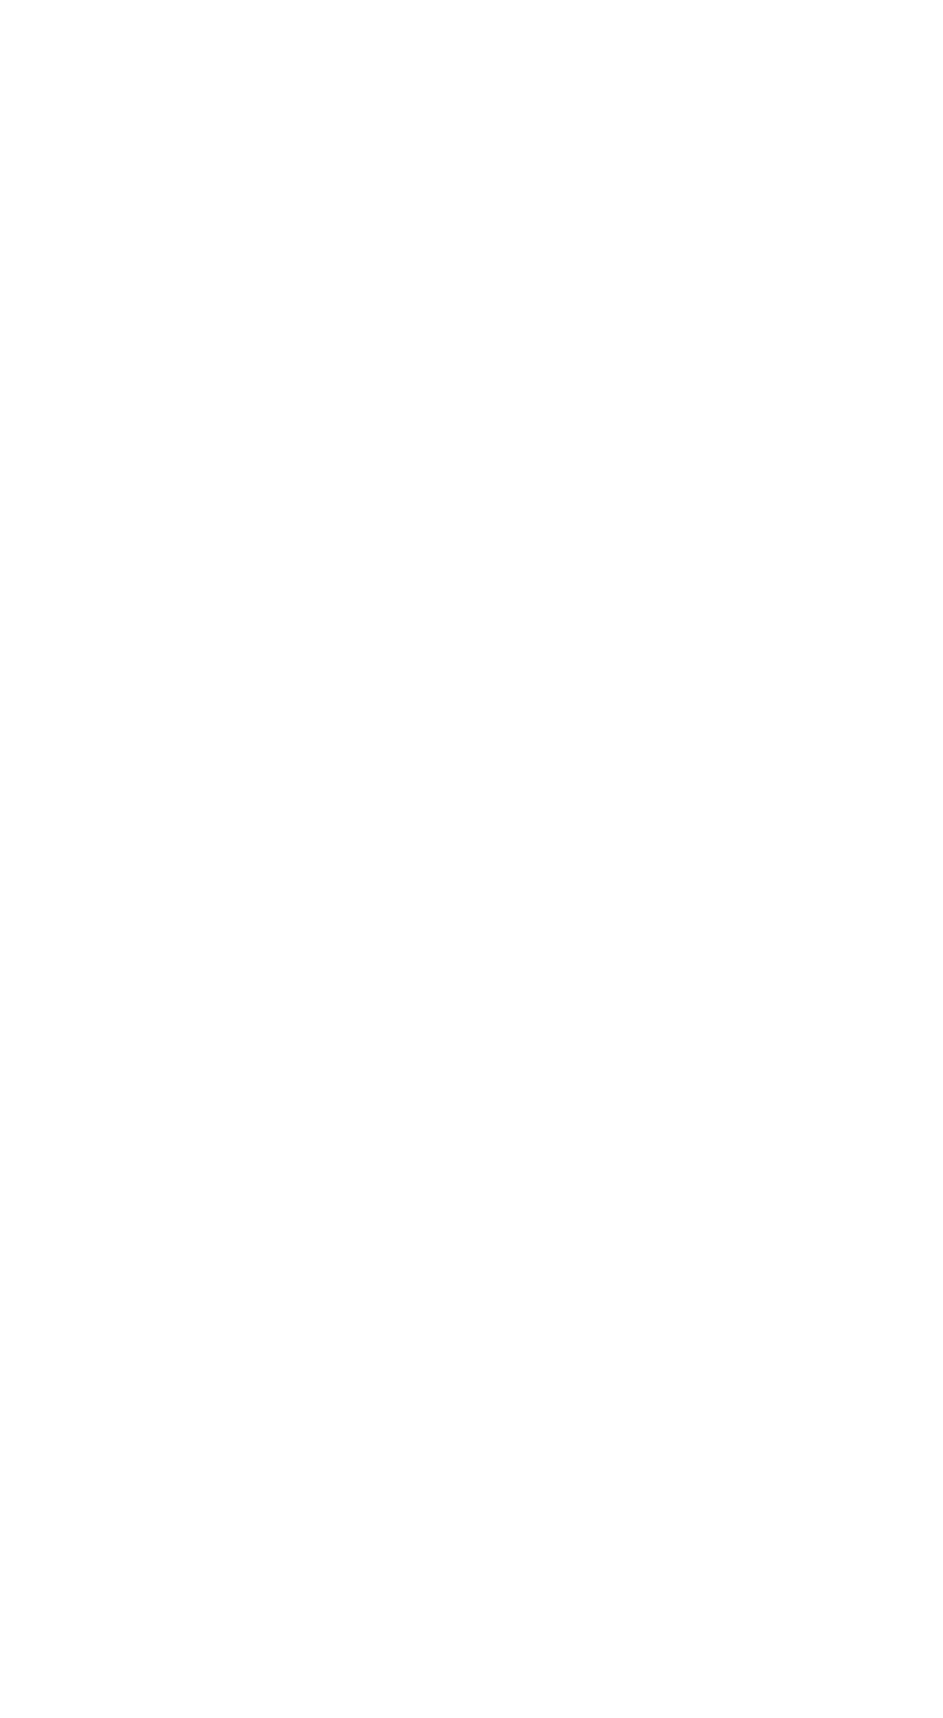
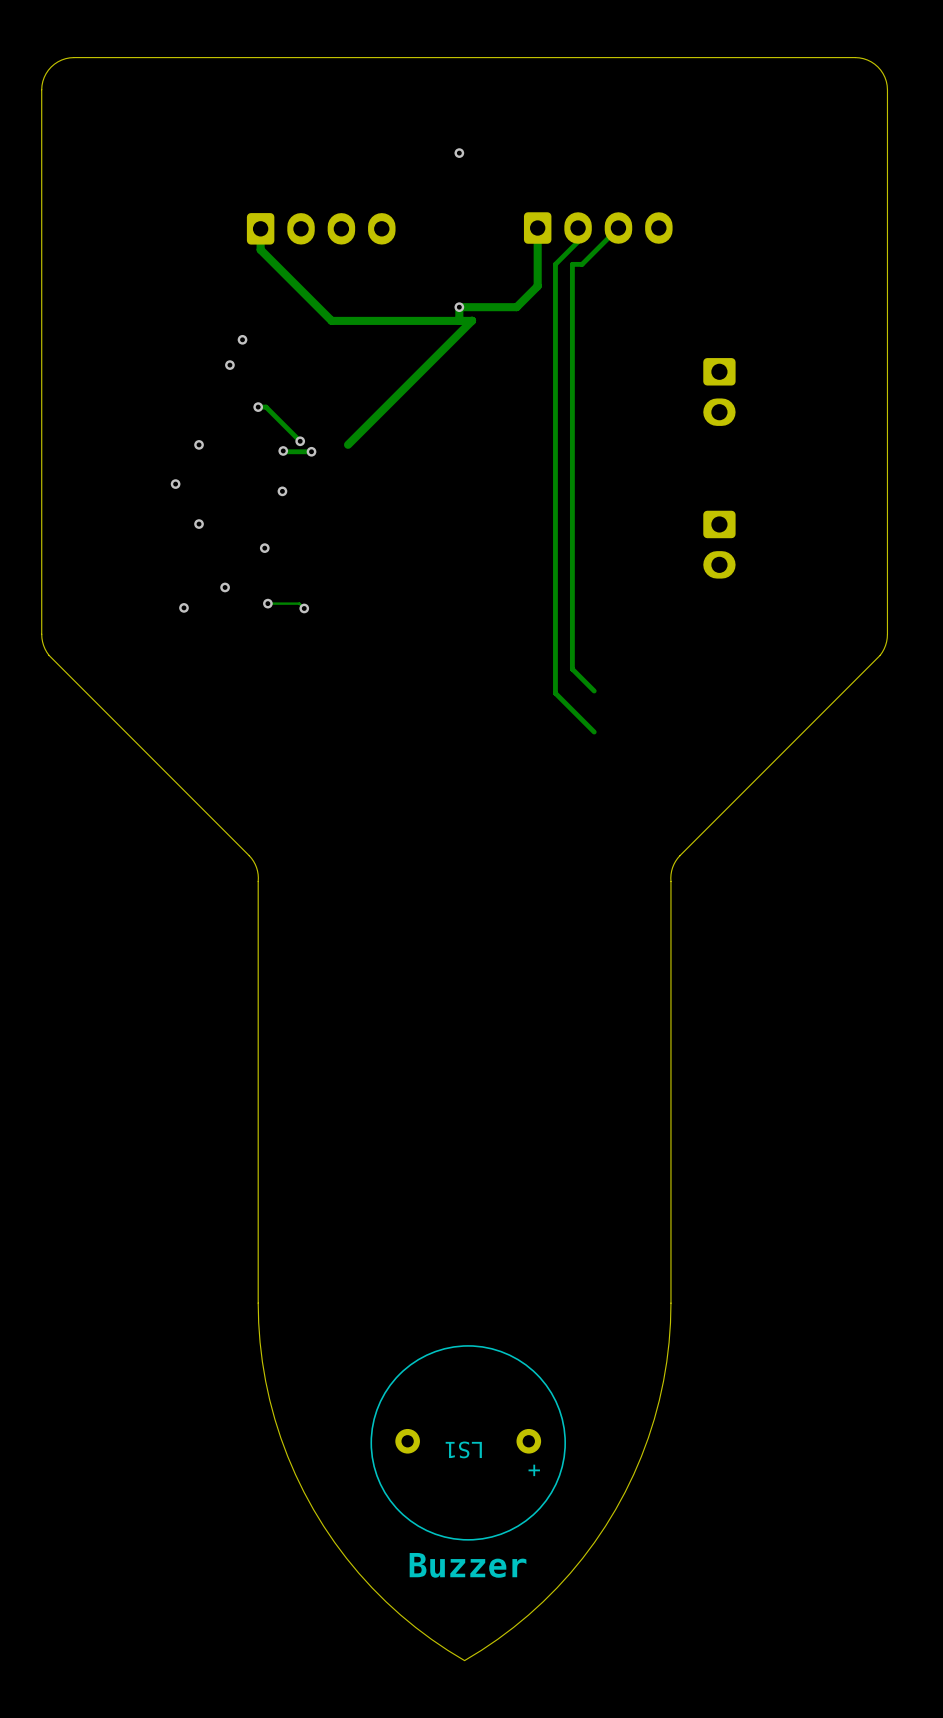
via: none -> (459, 153)
track: none -> (260, 228) (260, 249) (331, 320) (471, 320)
part: none -> (321, 228)
track: none -> (537, 228) (537, 286) (516, 307) (459, 307) (459, 320)
track: none -> (578, 228) (578, 241) (555, 264) (555, 693) (594, 732)
part: none -> (598, 228)
track: none -> (618, 228) (582, 264) (572, 264) (572, 669) (594, 691)
via: none -> (459, 307)
track: none -> (472, 320) (348, 444)
via: none -> (242, 339)
via: none -> (229, 365)
part: none -> (719, 391)
track: none -> (258, 407) (266, 407) (300, 441)
via: none -> (258, 407)
via: none -> (300, 441)
via: none -> (199, 444)
track: none -> (283, 450) (311, 451)
via: none -> (283, 450)
via: none -> (311, 451)
via: none -> (175, 484)
via: none -> (282, 491)
via: none -> (199, 524)
part: none -> (719, 544)
via: none -> (264, 548)
via: none -> (225, 587)
track: none -> (267, 603) (299, 603) (304, 608)
via: none -> (267, 603)
via: none -> (183, 607)
via: none -> (304, 608)
LS1: none -> (468, 1442)
text: none -> Buzzer (468, 1565)
board edge: none -> (464, 1660) (497, 1639) (528, 1615) (570, 1573) (594, 1542) (615, 1509) (633, 1474) (648, 1438) (659, 1400) (666, 1361) (670, 1322) (670, 877) (673, 864) (679, 855) (880, 655) (886, 641) (886, 81) (883, 73) (874, 64) (867, 60) (855, 57) (65, 58) (54, 64) (48, 70) (44, 77) (41, 89) (42, 641) (48, 655) (249, 855) (255, 864) (258, 877) (258, 1322) (262, 1361) (269, 1400) (280, 1438) (295, 1474) (313, 1509) (334, 1542) (358, 1573) (386, 1601) (415, 1627) (464, 1660)

